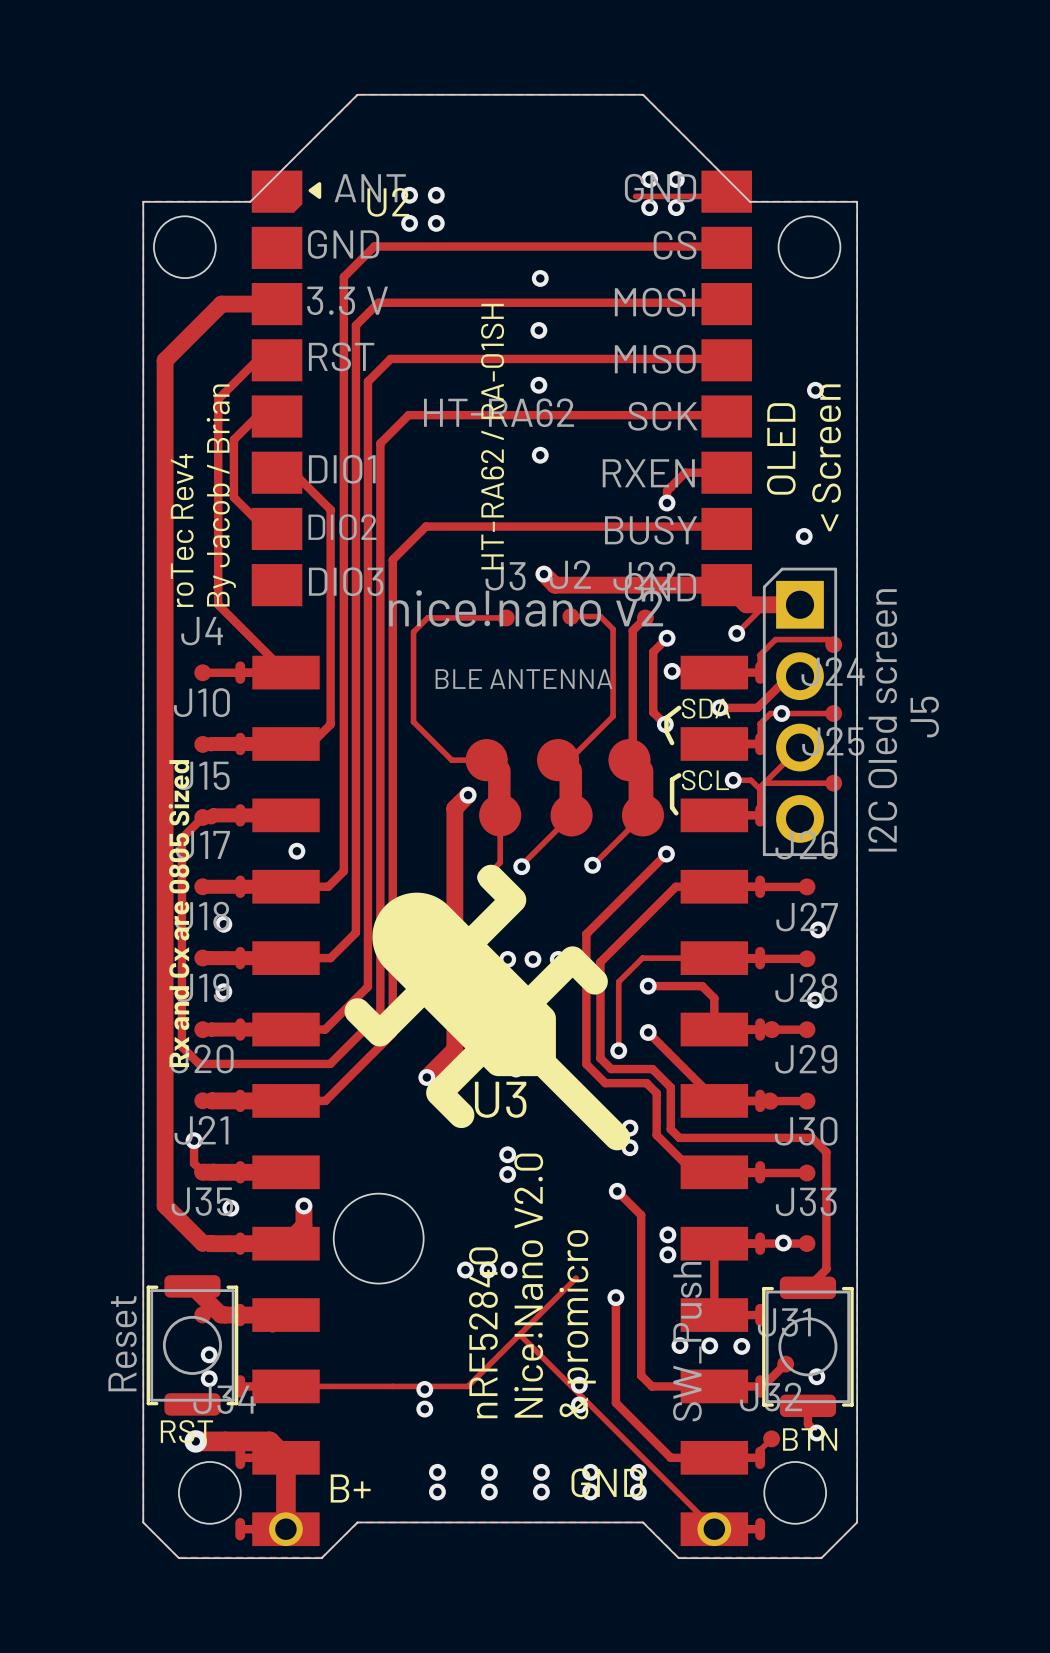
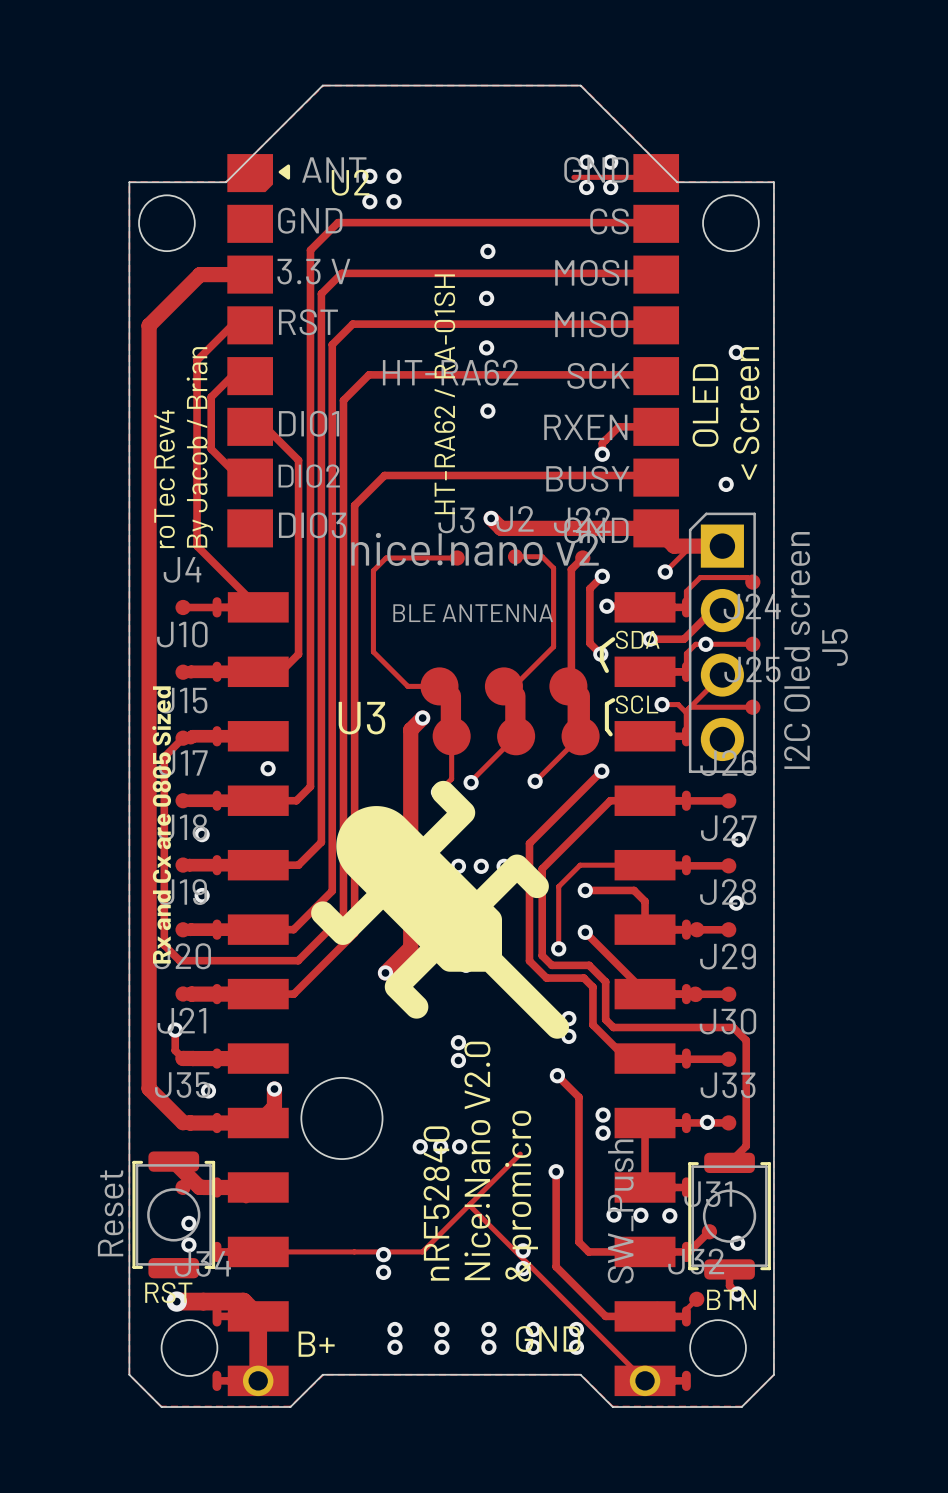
U3 name position: U3 (500, 1099) -> U3 (361, 718)

